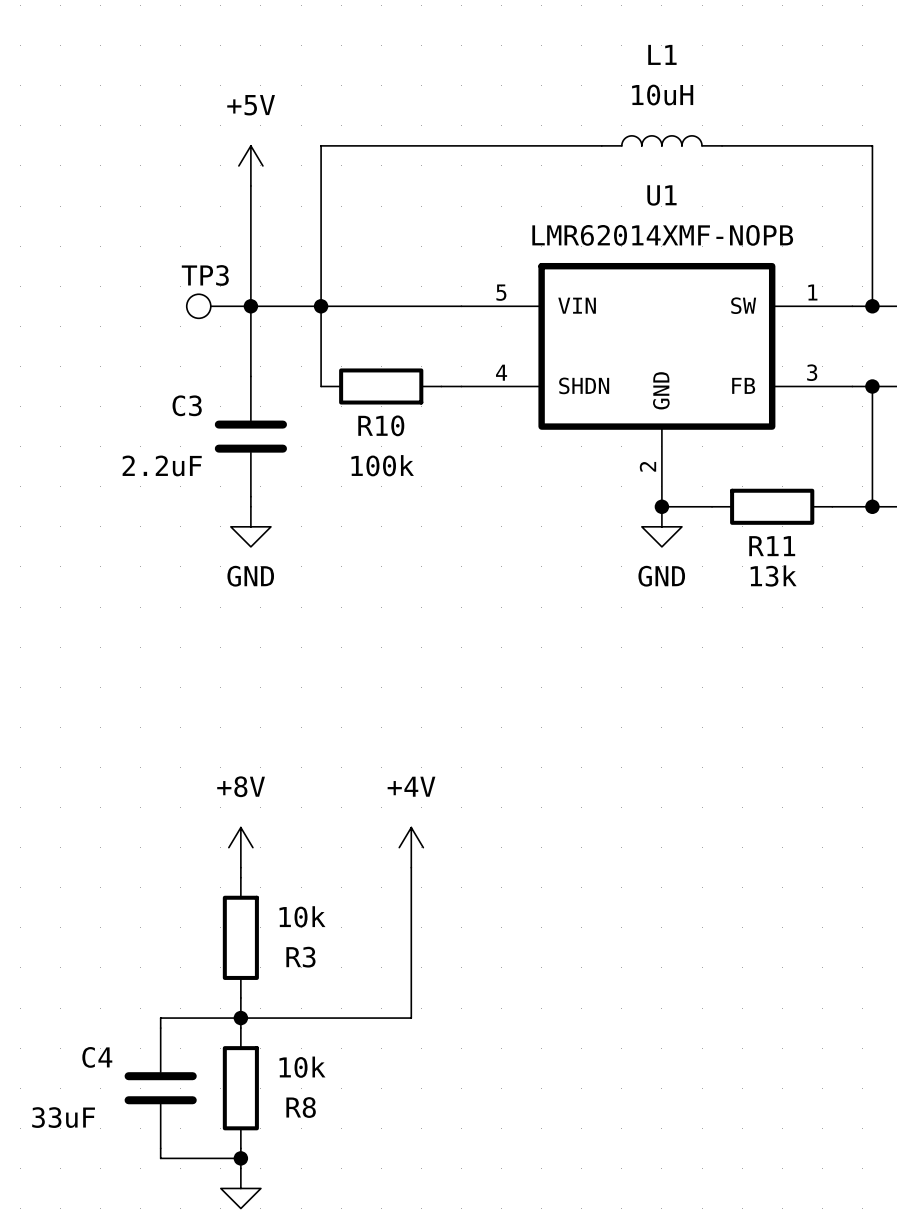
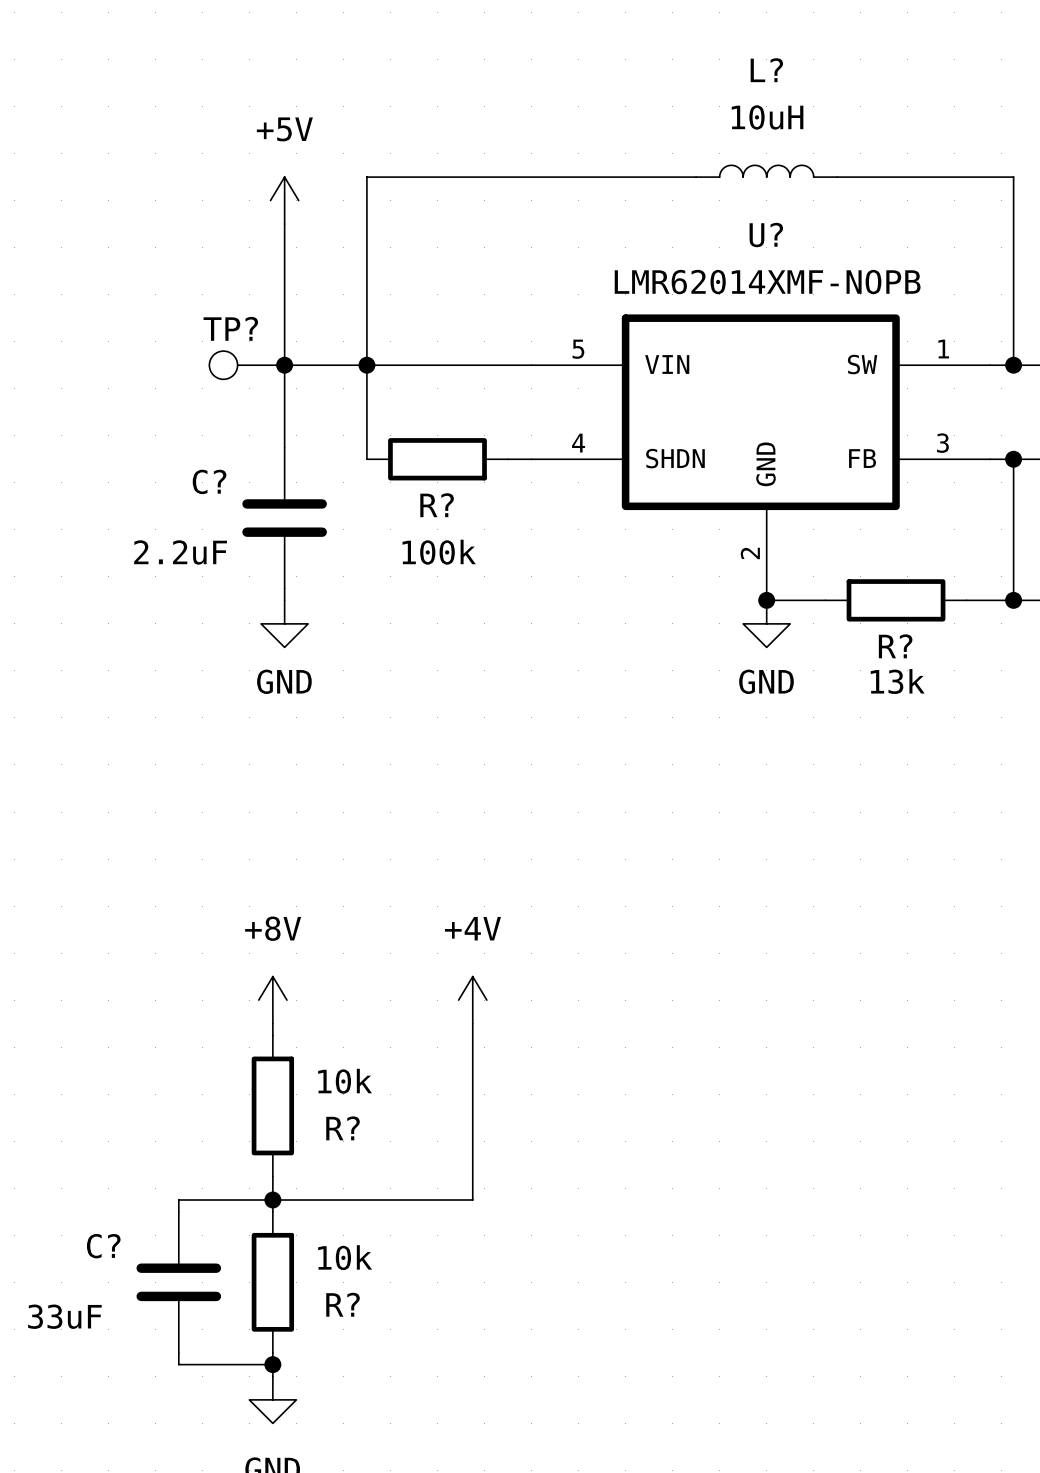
L1 name: L1 (662, 54) -> L? (766, 70)
U1 name: U1 (661, 195) -> U? (766, 235)
TP3 name: TP3 (205, 275) -> TP? (230, 328)
C3 name: C3 (187, 405) -> C? (209, 481)
R10 name: R10 (381, 425) -> R? (437, 505)
R11 name: R11 (772, 546) -> R? (895, 646)
R3 name: R3 (300, 957) -> R? (343, 1128)
C4 name: C4 (97, 1057) -> C? (103, 1246)
R8 name: R8 (301, 1107) -> R? (343, 1304)

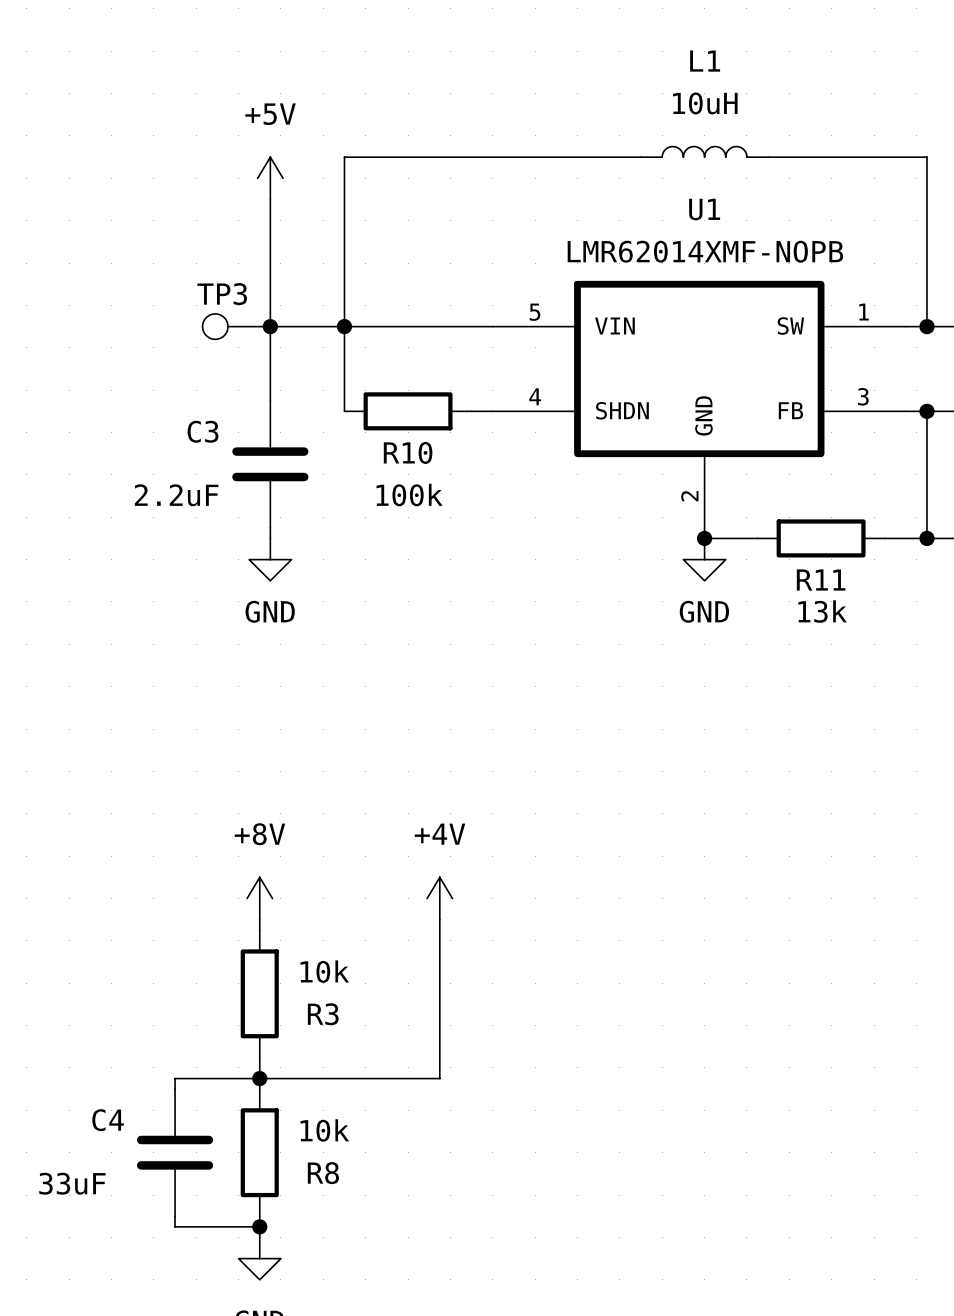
L? name: L? (766, 70) -> L1 (705, 61)
U? name: U? (766, 235) -> U1 (704, 209)
TP? name: TP? (230, 328) -> TP3 (222, 294)
C? name: C? (209, 481) -> C3 (203, 431)
R? name: R? (437, 505) -> R10 (408, 452)
R? name: R? (895, 646) -> R11 (821, 580)
R? name: R? (343, 1128) -> R3 (323, 1014)
C? name: C? (103, 1246) -> C4 (108, 1120)
R? name: R? (343, 1304) -> R8 (323, 1173)

